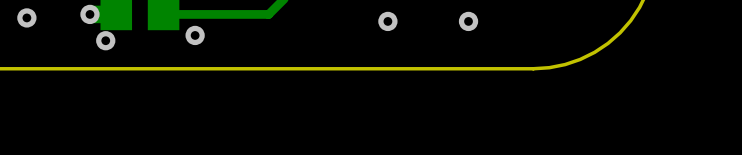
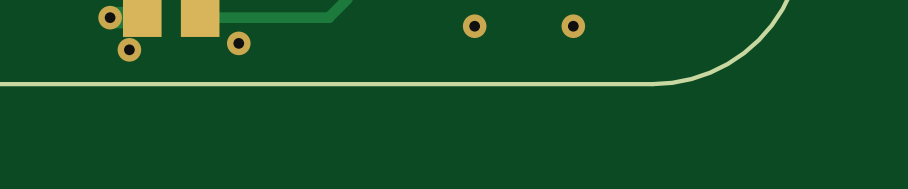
via: (26, 17) -> none

